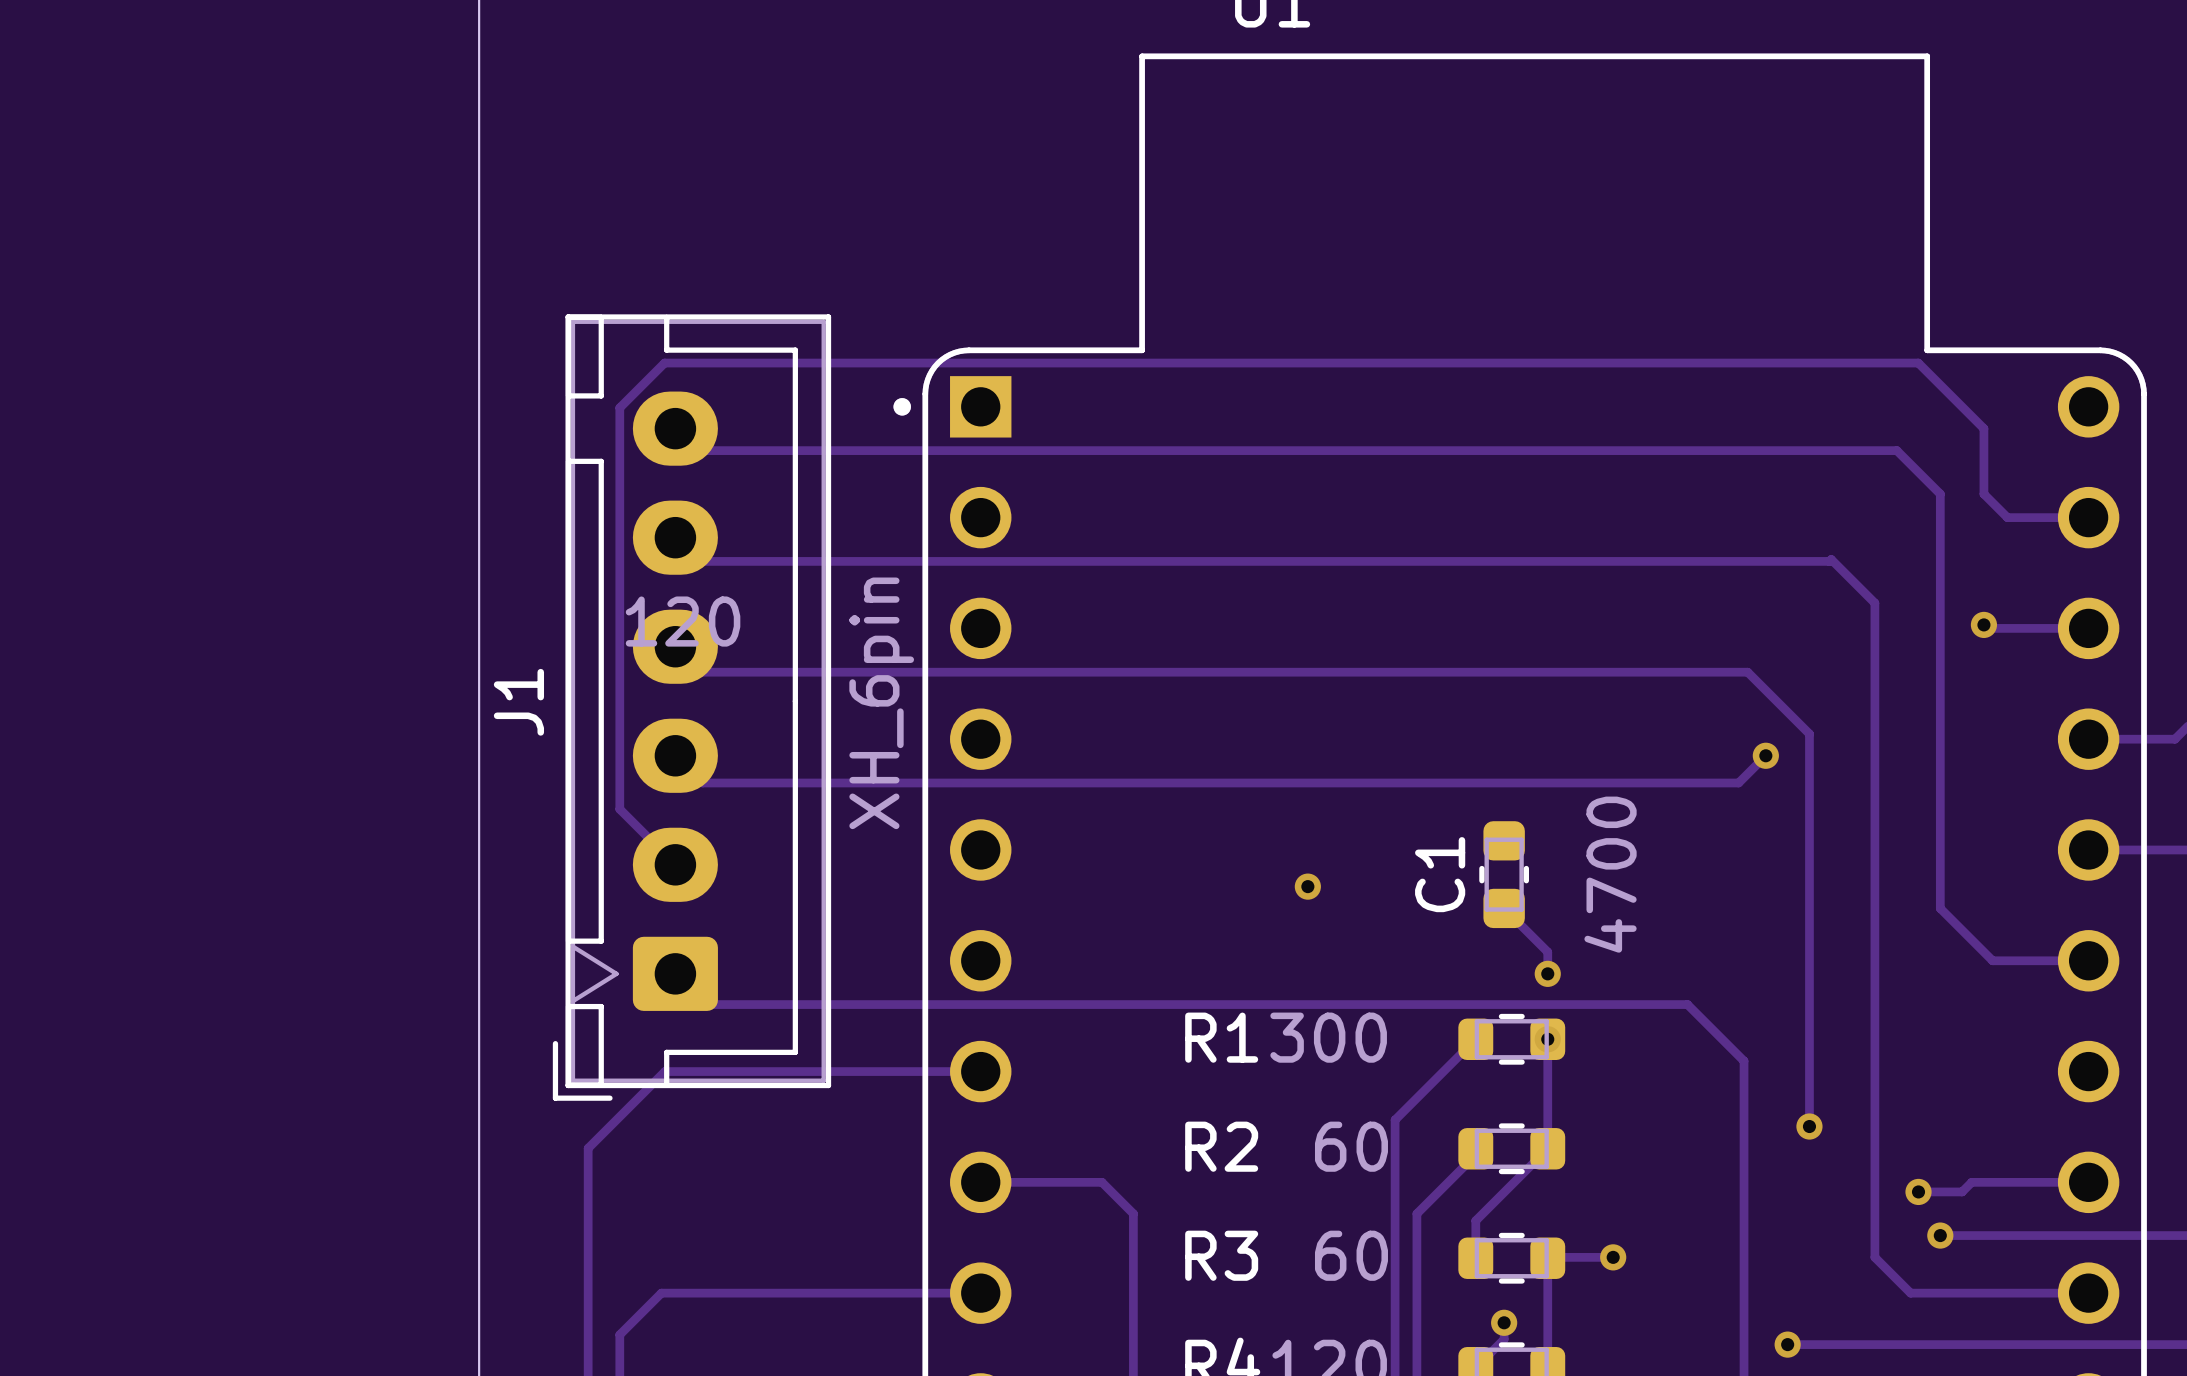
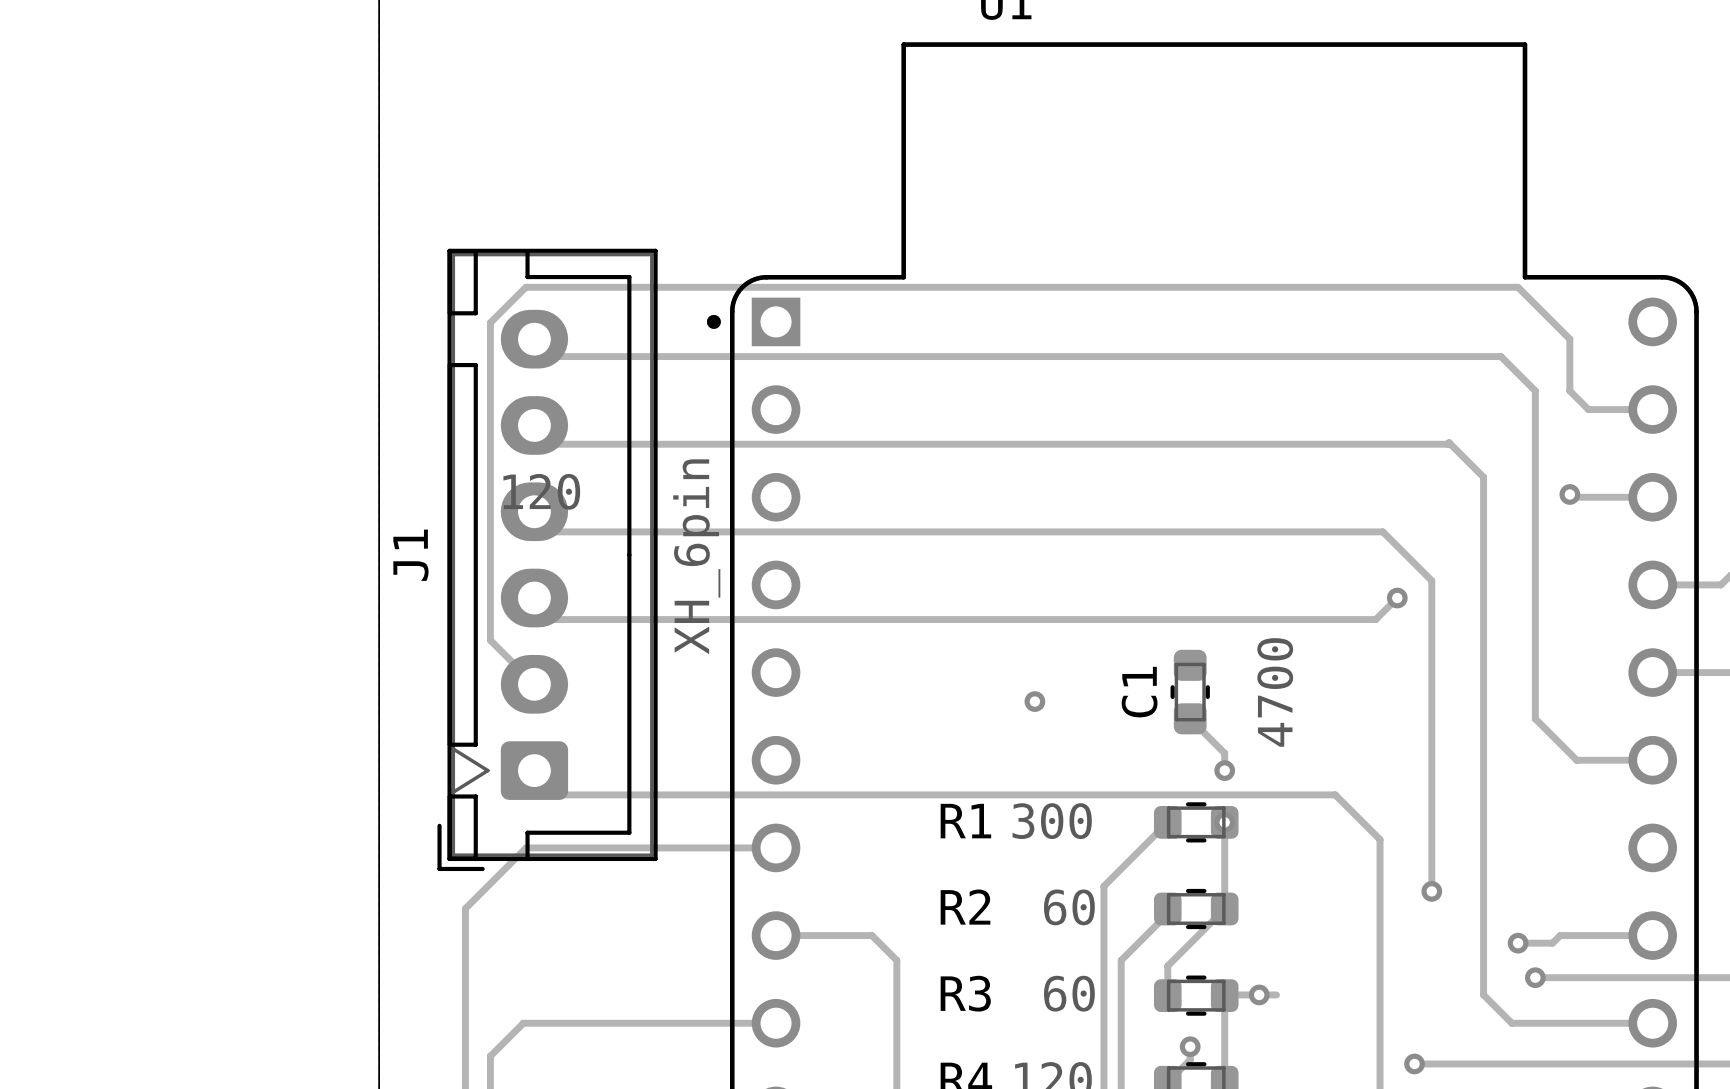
via position: (1613, 1257) -> (1259, 994)

